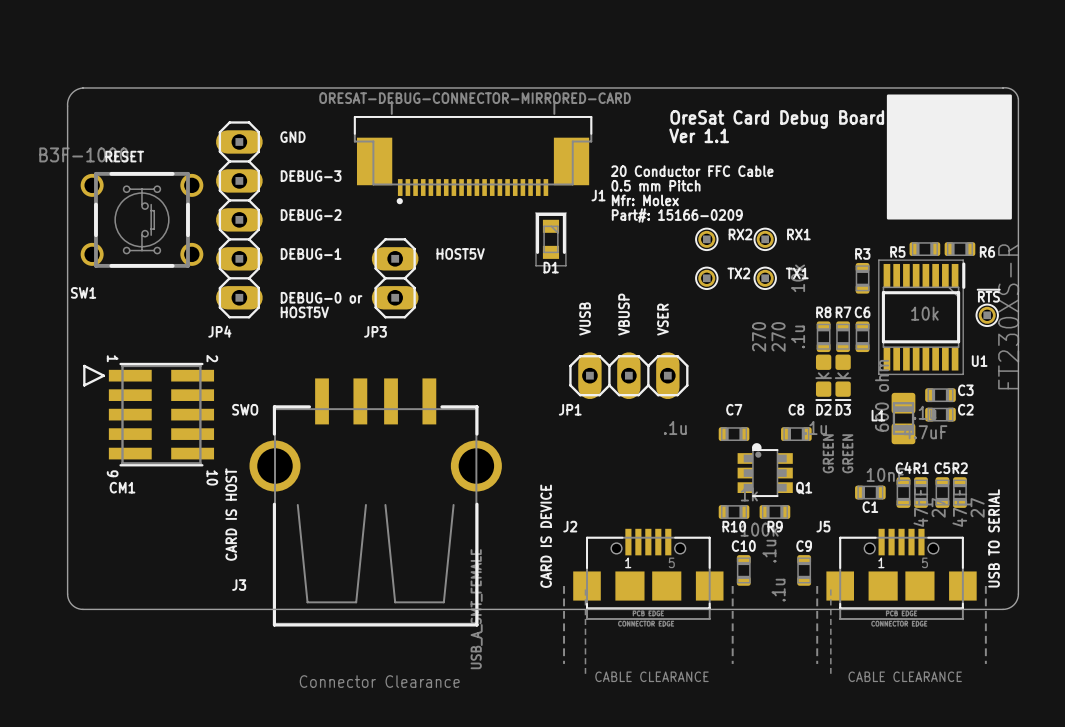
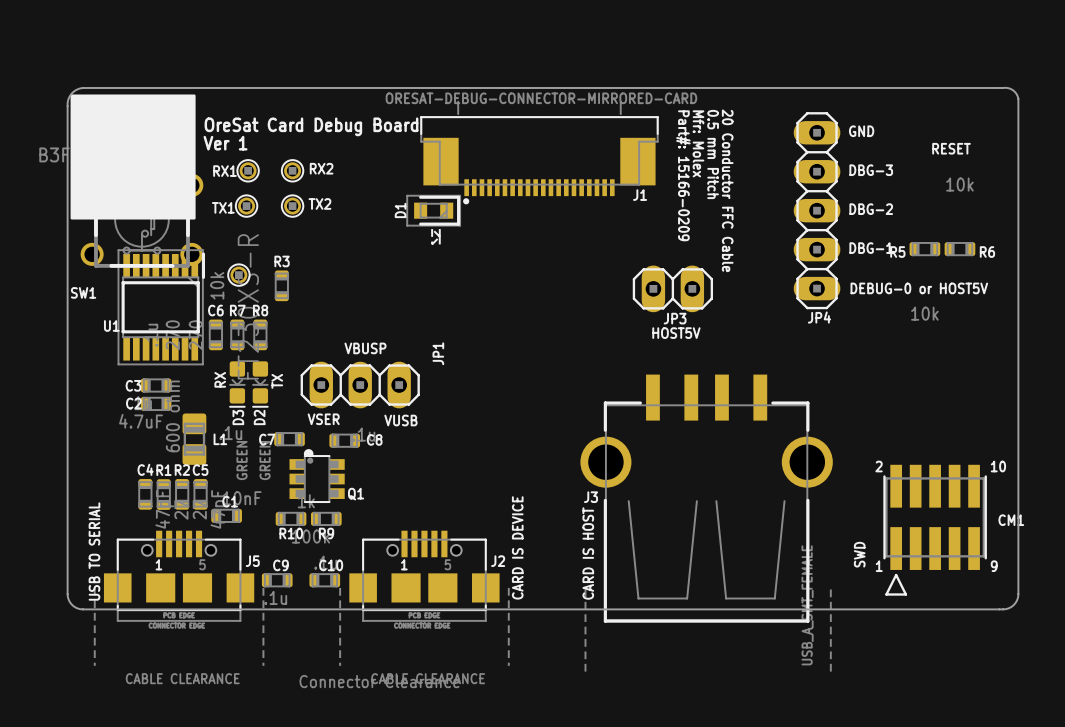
drawing: none -> [70, 94, 196, 220]
drawing: [886, 94, 1012, 220] -> none
text: OreSat Card Debug Board (777, 119) -> none
text: none -> OreSat Card Debug Board (311, 126)
text: none -> GND (861, 131)
text: Ver 1.1 (699, 135) -> none
text: GND (292, 137) -> none
text: none -> Ver 1 (225, 143)
text: none -> RESET (951, 148)
J1 position: (473, 152) -> (539, 152)
text: RESET (124, 156) -> none
text: none -> DBG-3 (871, 170)
text rotation: 0° (692, 171) -> 90° clockwise (727, 190)
text: DEBUG-3 (311, 176) -> none
text rotation: 0° (655, 185) -> 90° clockwise (713, 154)
J1 name position: J1 (598, 195) -> J1 (640, 195)
text rotation: 0° (645, 200) -> 90° clockwise (698, 143)
text: none -> DBG-2 (871, 209)
text: DEBUG-2 (311, 215) -> none
text rotation: 0° (677, 215) -> 90° clockwise (683, 175)
JP4 position: (239, 219) -> (817, 210)
line: none -> (432, 229) (432, 244) (439, 236) (432, 229)
line: none -> (439, 229) (439, 244)
RX2 name position: RX2 (740, 234) -> RX2 (321, 168)
RX1 name position: RX1 (798, 234) -> RX1 (224, 171)
D1 rotation: 0° (550, 239) -> 90° clockwise (433, 210)
D1 position: (550, 239) -> (433, 210)
RX2 position: (706, 239) -> (292, 170)
RX1 position: (765, 239) -> (248, 170)
text: none -> DBG-1 (871, 248)
text: DEBUG-1 (311, 253) -> none
text: HOST5V (460, 253) -> none
TX2 name position: TX2 (738, 273) -> TX2 (319, 203)
TX1 name position: TX1 (797, 273) -> TX1 (223, 207)
part: none -> (238, 275)
JP3 rotation: 0° (395, 278) -> 90° clockwise (672, 288)
JP3 position: (395, 278) -> (672, 288)
TX2 position: (706, 278) -> (292, 206)
TX1 position: (765, 278) -> (246, 206)
R3 position: (862, 278) -> (281, 285)
text: none -> DEBUG-0 or HOST5V (919, 288)
text: DEBUG-0 or (321, 297) -> none
text: HOST5V (304, 312) -> none
text rotation: 0° (624, 314) -> 90° clockwise (365, 348)
text position: VBUSP (624, 314) -> VBUSP (365, 348)
~{RTS}: (987, 315) -> none
U1 position: (921, 317) -> (161, 307)
text rotation: 0° (585, 318) -> 90° clockwise (400, 420)
text position: VUSB (585, 318) -> VUSB (400, 420)
text rotation: 0° (662, 319) -> 90° clockwise (323, 419)
text position: VSER (662, 319) -> VSER (323, 419)
JP4 name position: JP4 (219, 331) -> JP4 (819, 317)
JP3 name position: JP3 (375, 331) -> JP3 (675, 318)
text: none -> HOST5V (676, 333)
R8 position: (823, 336) -> (260, 334)
R7 position: (843, 336) -> (237, 334)
C6 position: (862, 336) -> (215, 334)
U1 name position: U1 (979, 361) -> U1 (111, 325)
JP1 position: (628, 375) -> (360, 385)
D2 position: (823, 377) -> (260, 384)
D3 position: (843, 377) -> (237, 384)
text: none -> RX (220, 379)
text: none -> TX (277, 381)
C3 name position: C3 (965, 390) -> C3 (133, 385)
C3 position: (940, 395) -> (156, 385)
text: SWO (245, 409) -> none
JP1 name rotation: 0° (570, 409) -> 90° counterclockwise (438, 353)
JP1 name position: JP1 (570, 409) -> JP1 (438, 353)
C7 name position: C7 (734, 409) -> C7 (267, 439)
C8 name position: C8 (796, 409) -> C8 (374, 439)
D2 name rotation: 0° (823, 409) -> 90° counterclockwise (259, 417)
D3 name rotation: 0° (843, 409) -> 90° counterclockwise (238, 417)
C2 name position: C2 (965, 409) -> C2 (133, 403)
CM1 rotation: 0° (148, 414) -> 90° counterclockwise (935, 530)
CM1 position: (148, 414) -> (935, 530)
C2 position: (940, 414) -> (156, 403)
L1 name position: L1 (878, 415) -> L1 (220, 439)
L1 position: (903, 418) -> (194, 439)
C7 position: (734, 434) -> (289, 439)
C8 position: (796, 434) -> (344, 440)
Q1 position: (765, 470) -> (317, 476)
CM1 name position: CM1 (122, 487) -> CM1 (1011, 520)
C1 position: (870, 492) -> (226, 515)
C4 position: (903, 492) -> (145, 494)
R1 position: (921, 492) -> (163, 494)
C5 position: (942, 492) -> (200, 494)
R2 position: (959, 492) -> (182, 494)
J3 position: (375, 502) -> (706, 498)
C1 name position: C1 (870, 507) -> C1 (230, 501)
R10 position: (734, 512) -> (291, 518)
R9 position: (774, 512) -> (326, 518)
text position: CARD IS HOST (231, 514) -> CARD IS HOST (588, 553)
J2 name position: J2 (570, 526) -> J2 (498, 561)
J5 name position: J5 (823, 526) -> J5 (252, 561)
text position: CARD IS DEVICE (546, 536) -> CARD IS DEVICE (517, 547)
text: USB TO SERIAL (994, 538) -> none
text: none -> USB TO SERIAL (94, 551)
text: none -> SWD (859, 554)
C10 rotation: 0° (743, 570) -> 90° clockwise (324, 580)
C10 position: (743, 570) -> (324, 580)
C9 rotation: 0° (804, 570) -> 90° clockwise (277, 580)
C9 position: (804, 570) -> (277, 580)
J3 name position: J3 (239, 585) -> J3 (590, 497)
J2 position: (648, 596) -> (424, 598)
J5 position: (901, 596) -> (179, 598)

